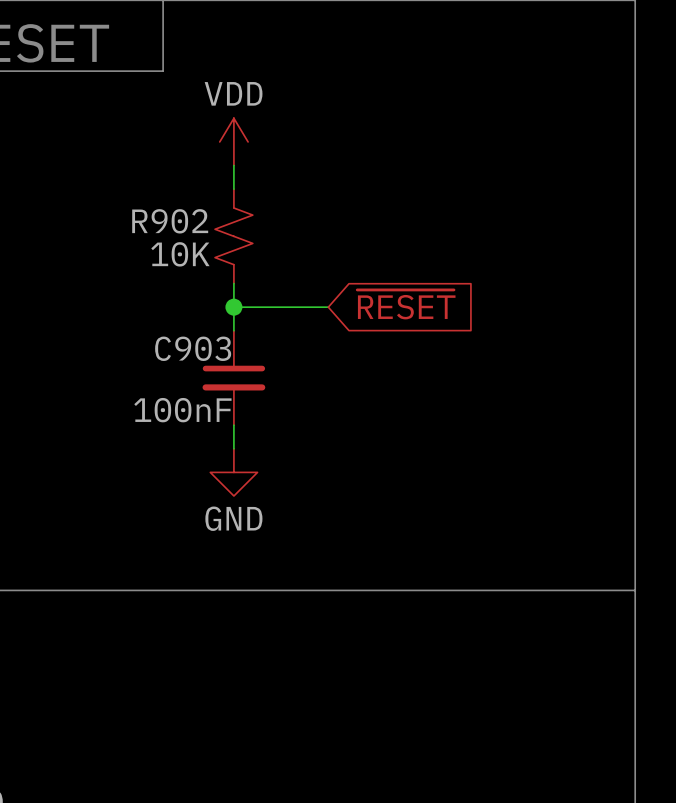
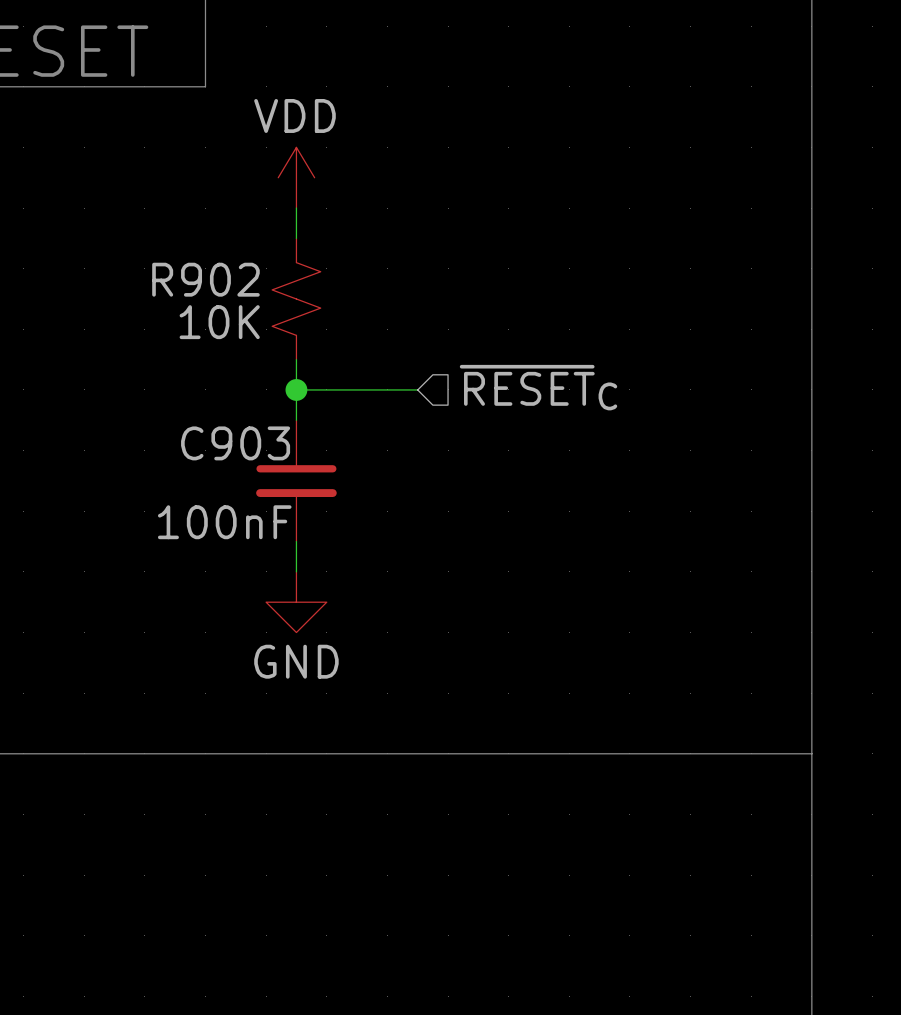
global label: ~{RESET} (406, 304) -> none
hierarchical label: none -> ~{RESET}C (538, 387)

